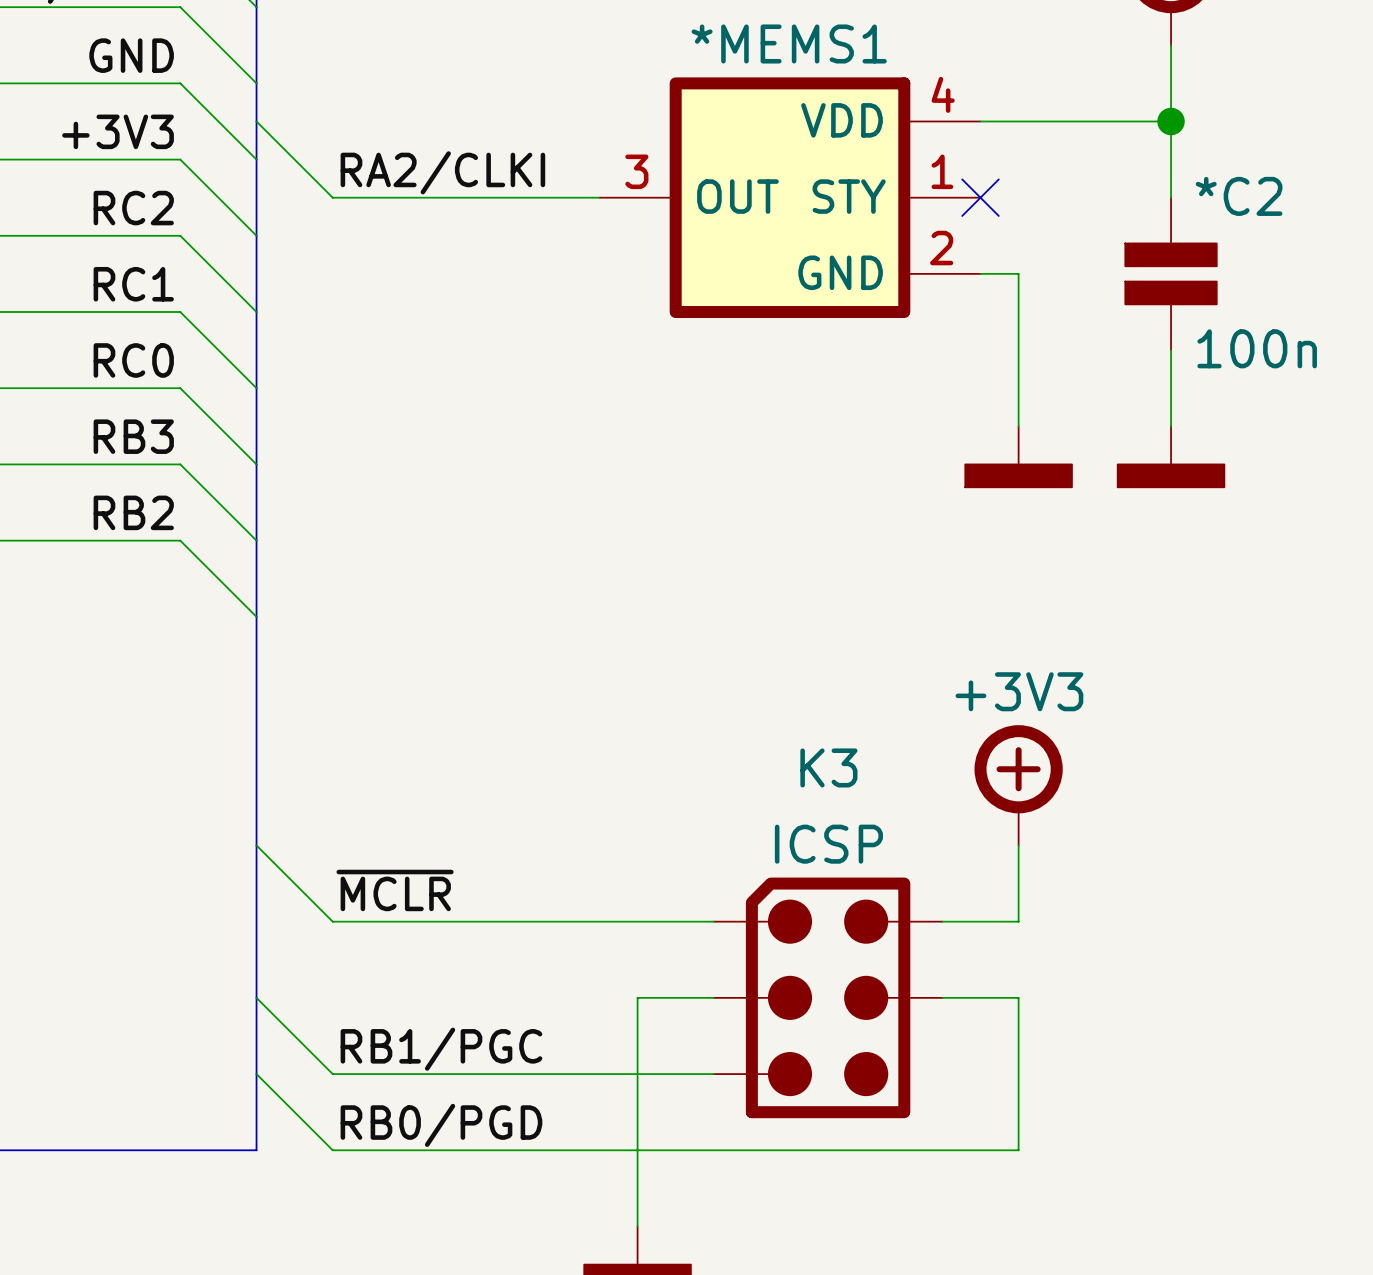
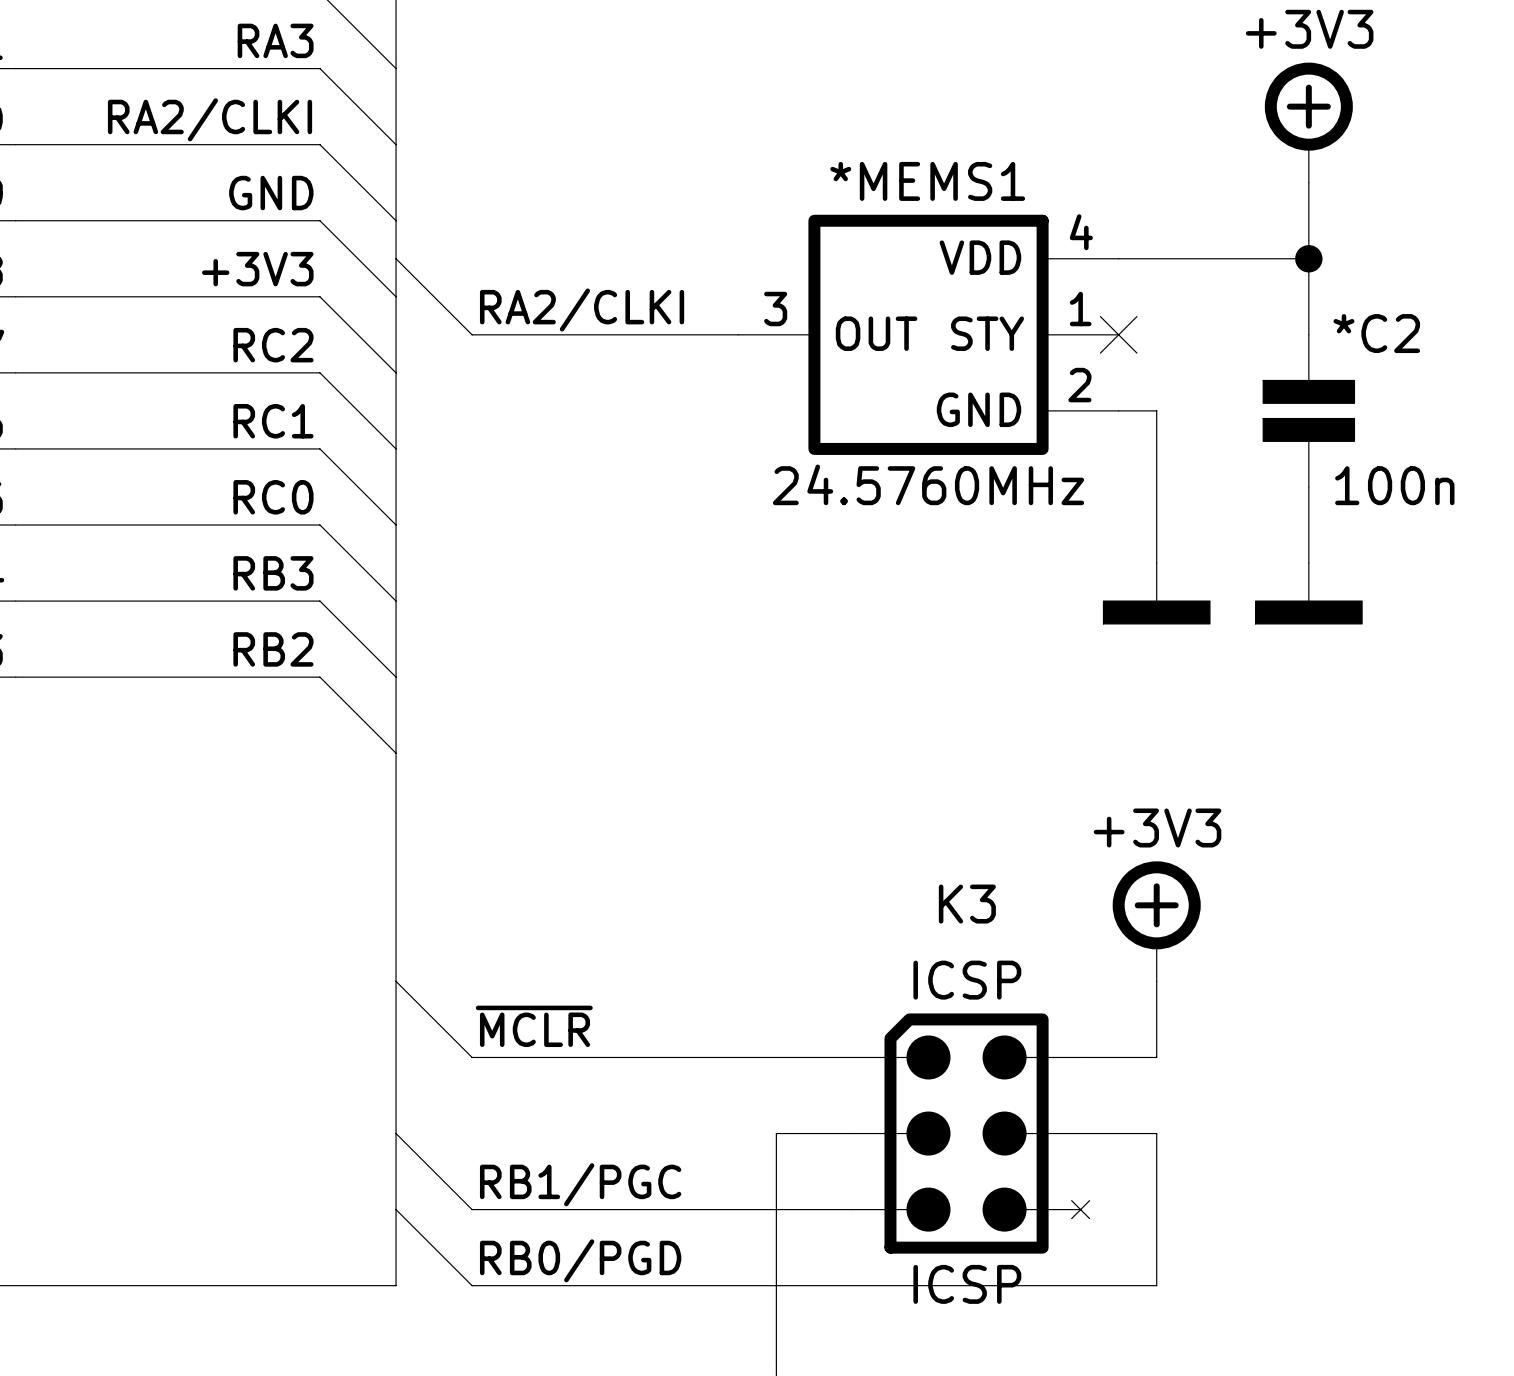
*MEMS1 text: none -> 24.5760MHz (928, 484)
K3 symbol: [713, 877, 943, 1119] -> [852, 1013, 1090, 1254]
K3 text: none -> ICSP (967, 1284)

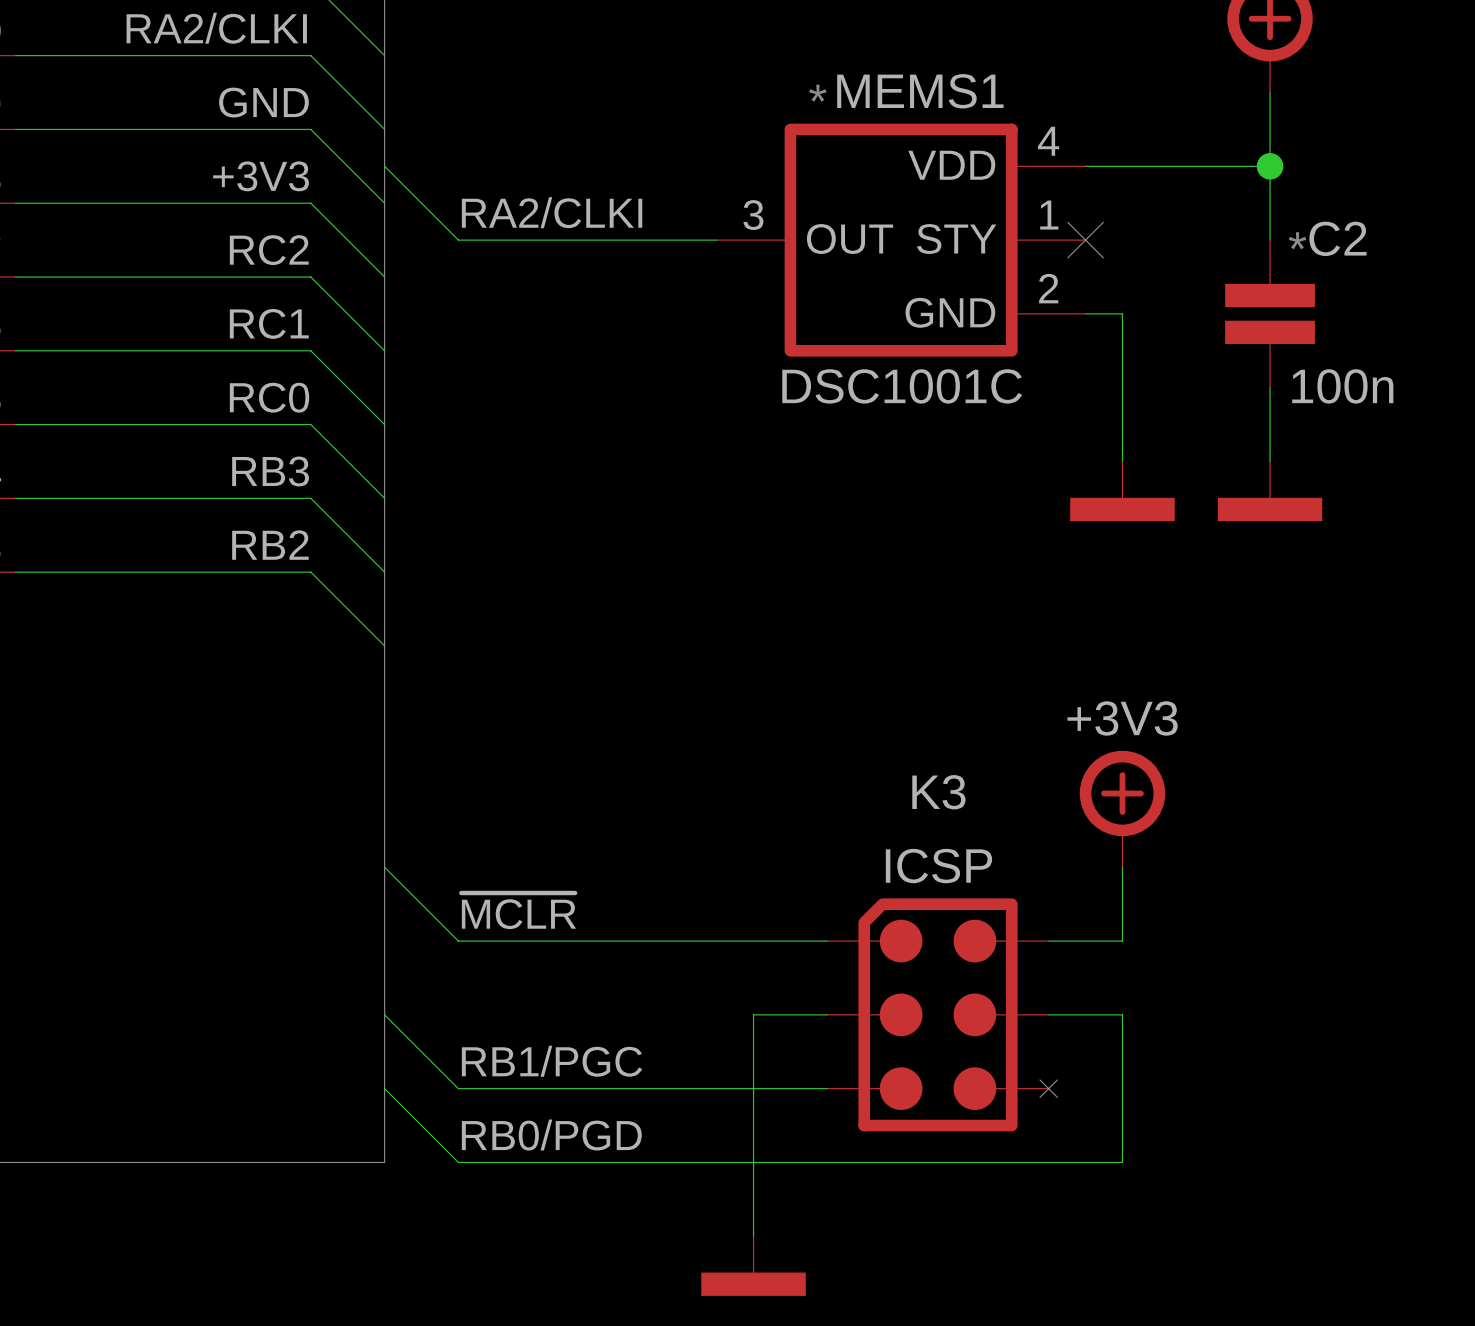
text: none -> * (817, 93)
*MEMS1 name: *MEMS1 (927, 181) -> MEMS1 (920, 91)
*C2 name: *C2 (1376, 333) -> C2 (1337, 238)
text: none -> * (1297, 240)
*MEMS1 text: 24.5760MHz (928, 484) -> none
*MEMS1 value: none -> DSC1001C (902, 386)
K3 text: ICSP (967, 1284) -> none

